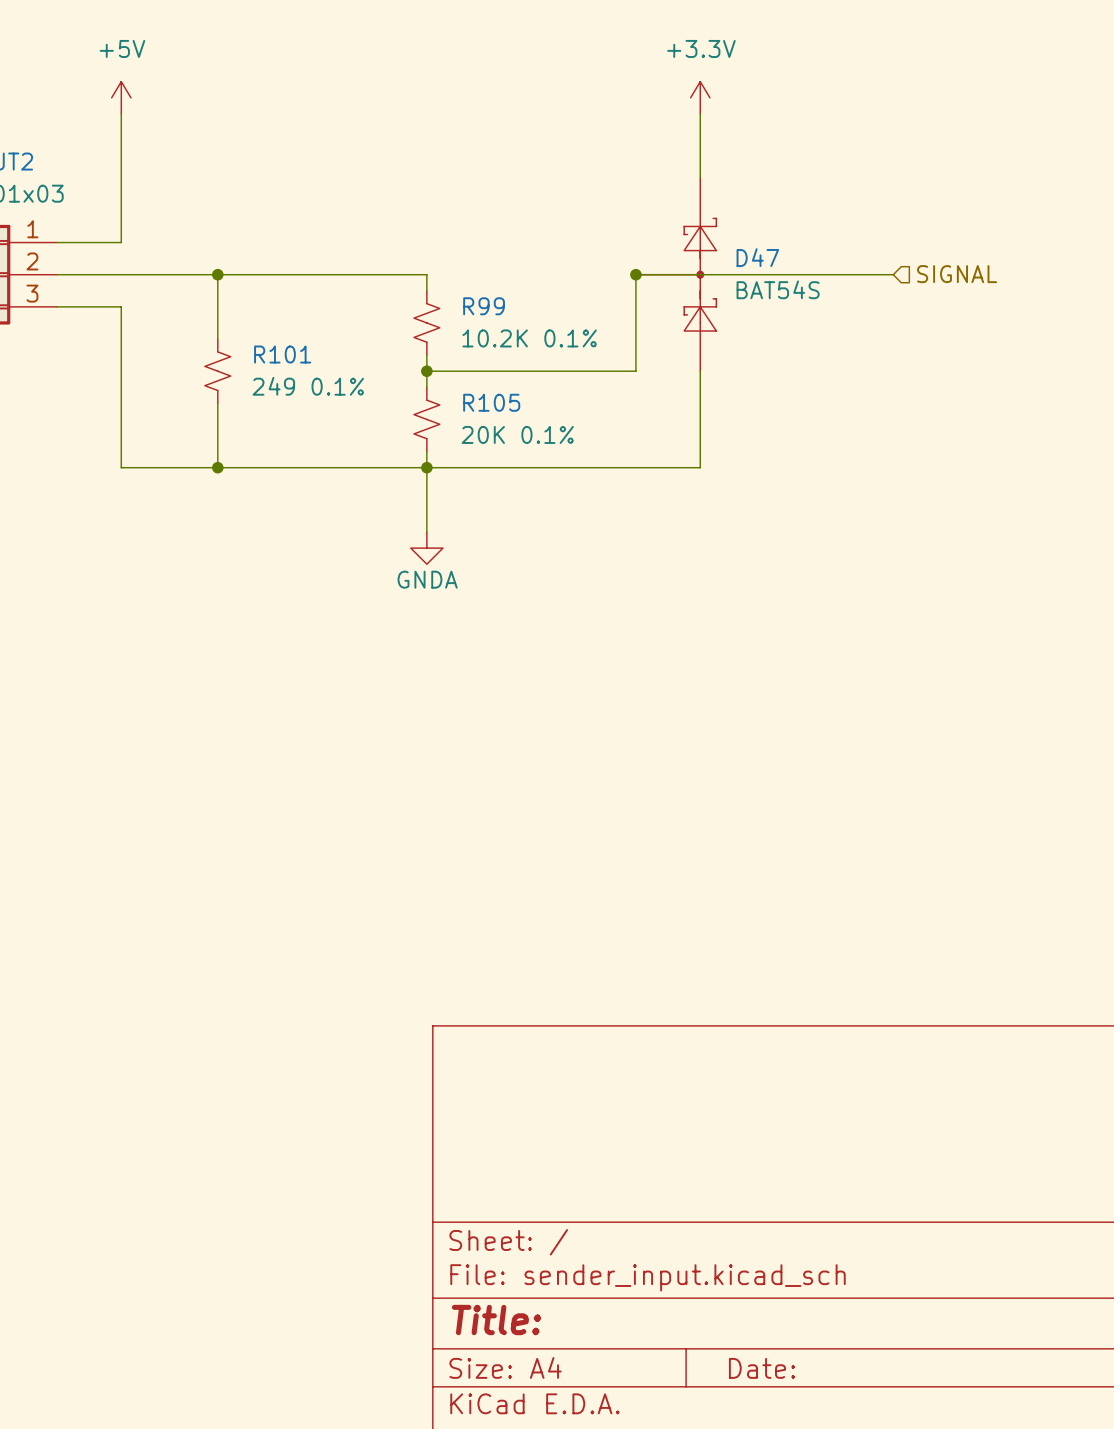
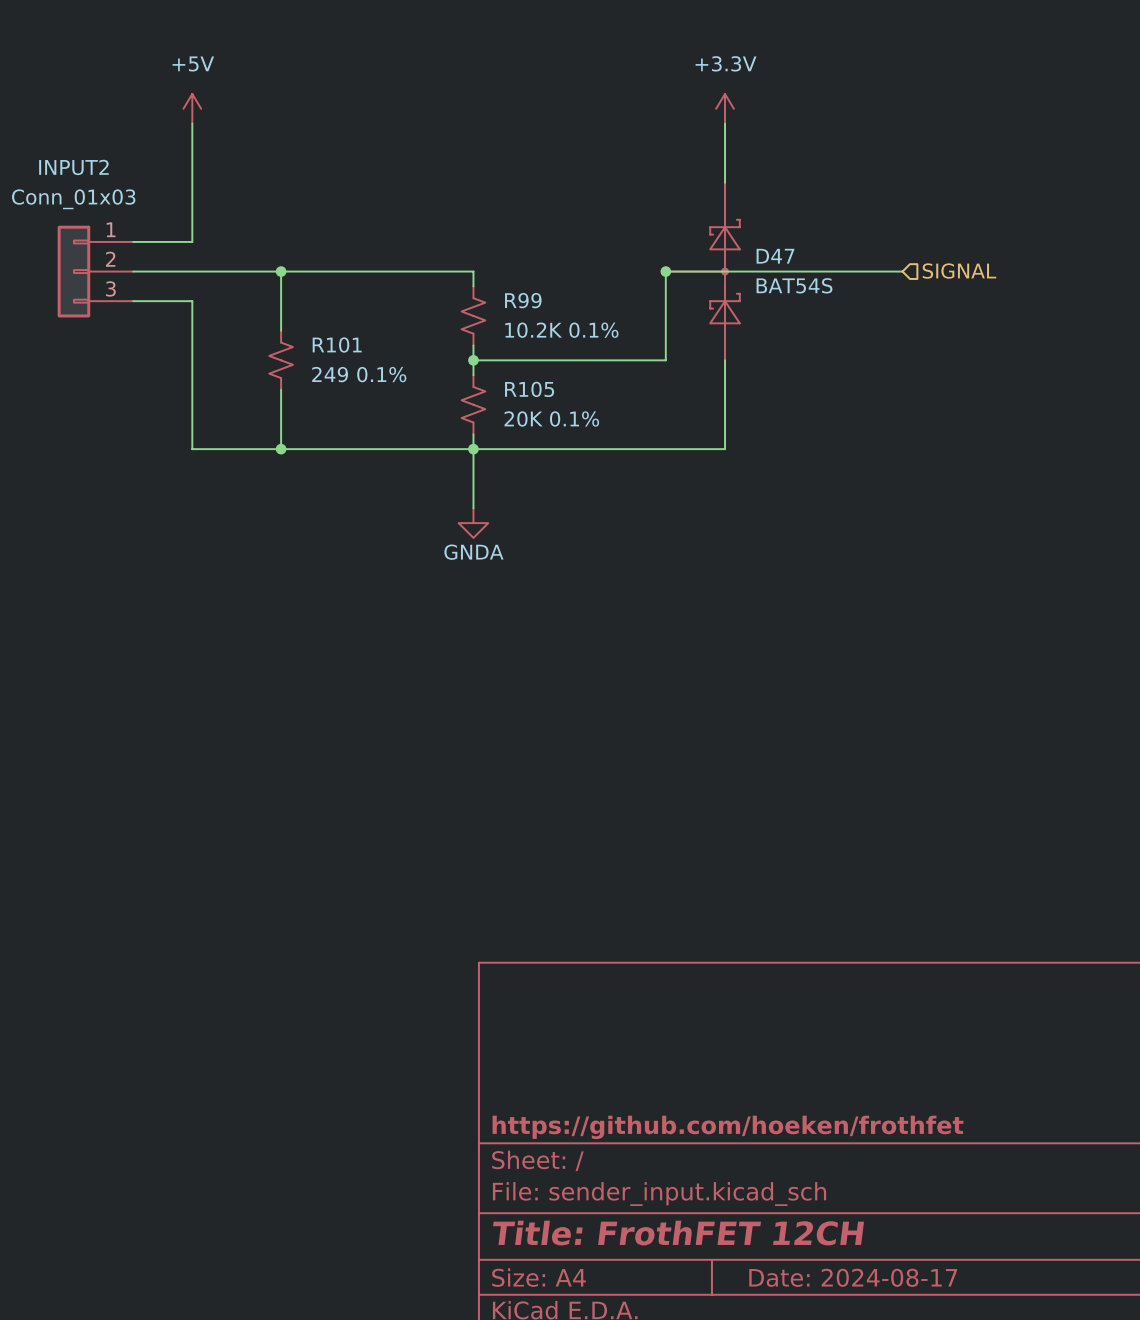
title block: none -> https://github.com/hoeken/frothfet (728, 1127)
title block: Title: (496, 1320) -> Title: FrothFET 12CH (678, 1233)
title block: Date: (761, 1368) -> Date: 2024-08-17 (853, 1277)

